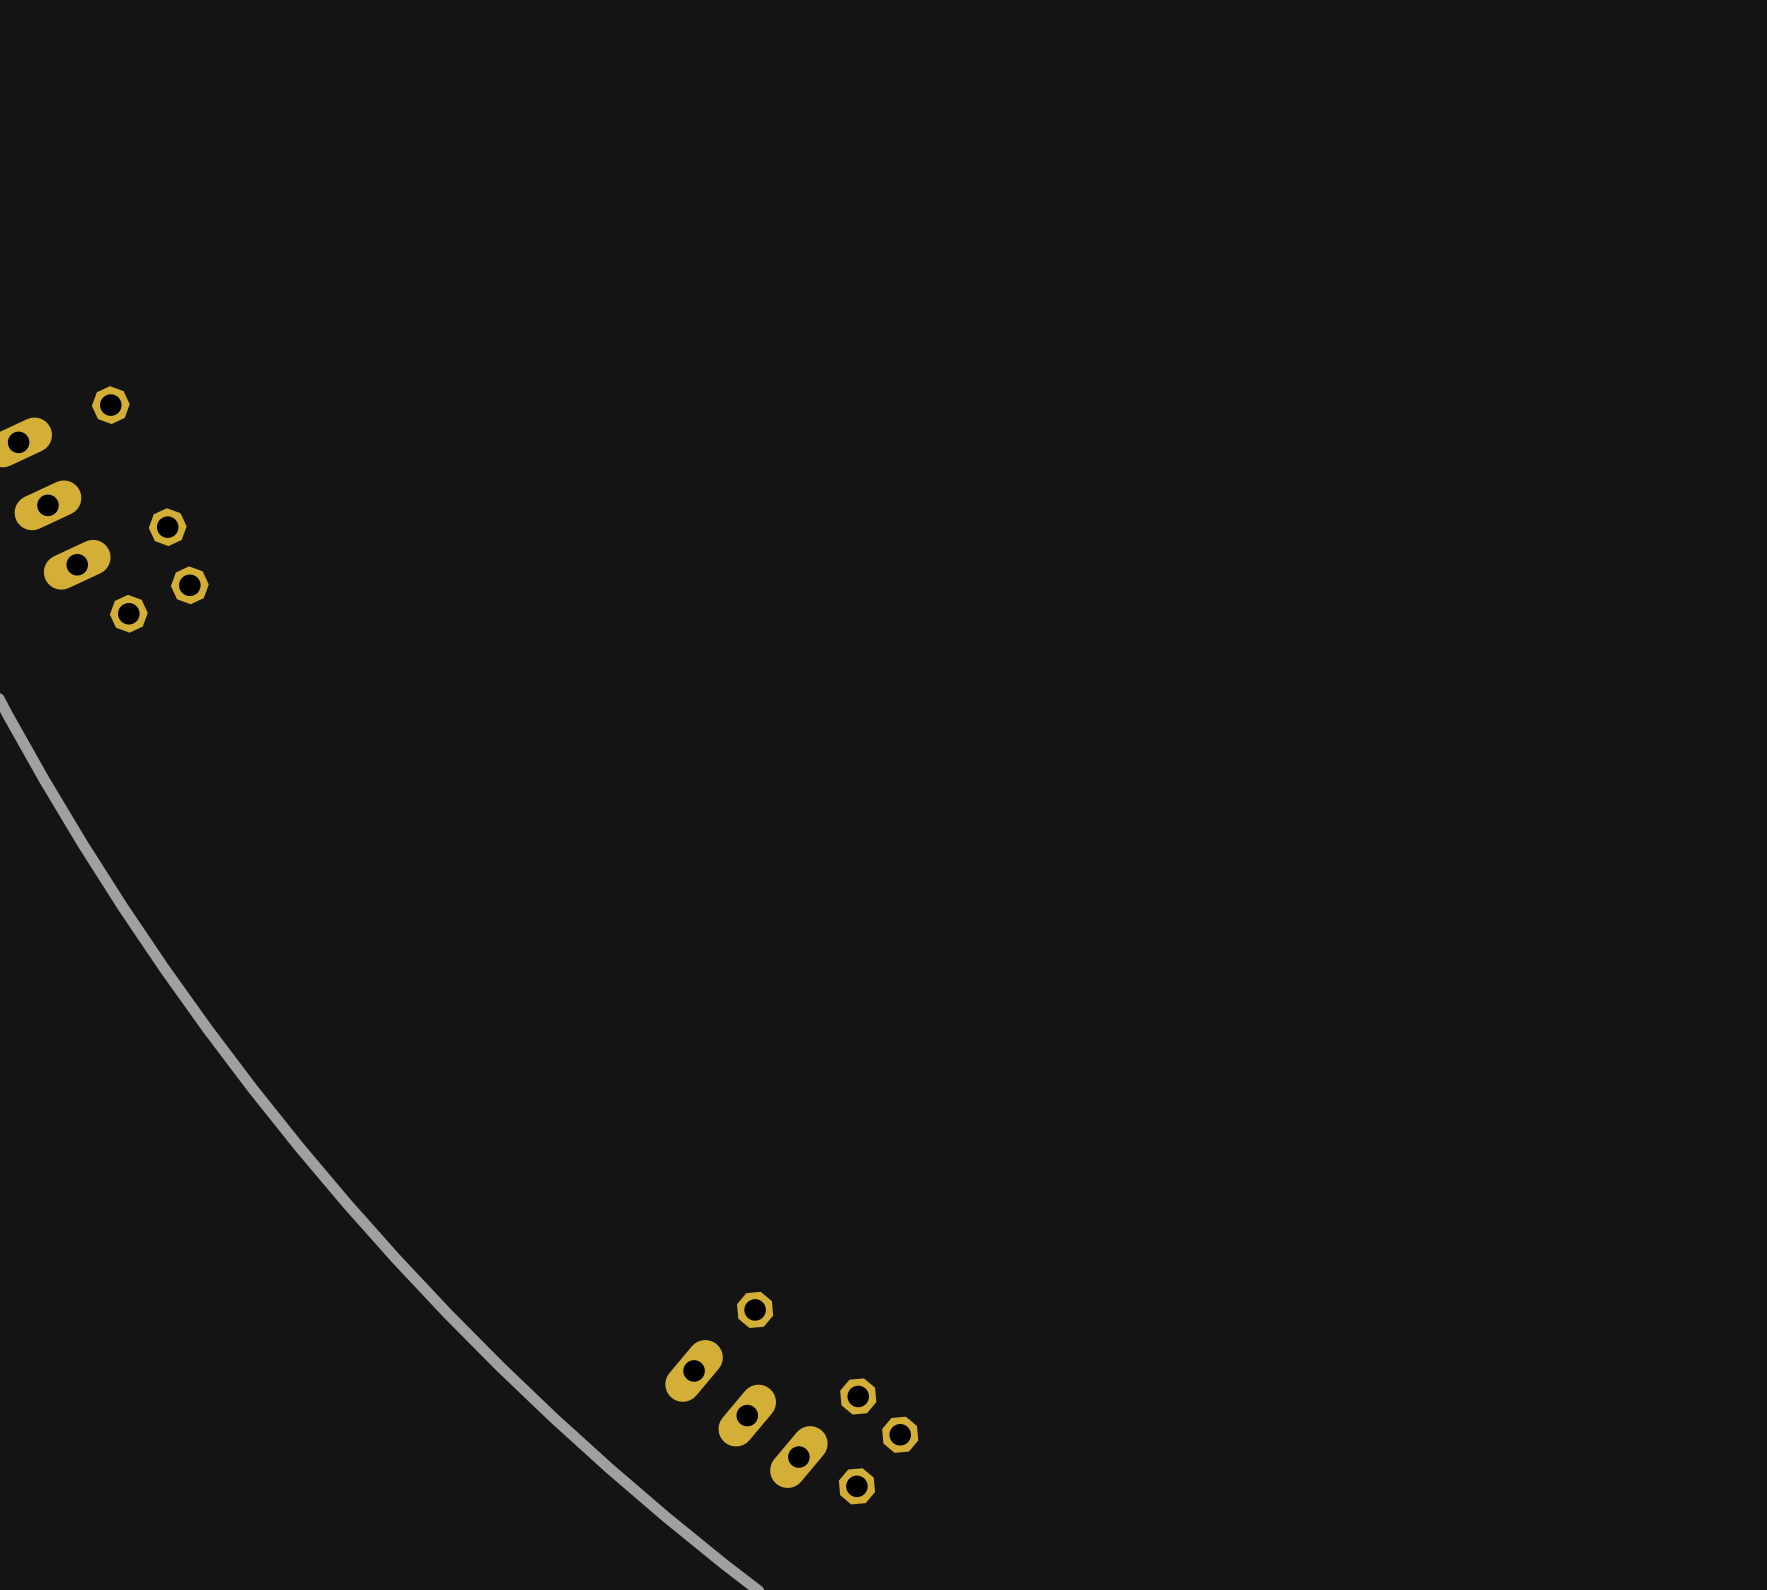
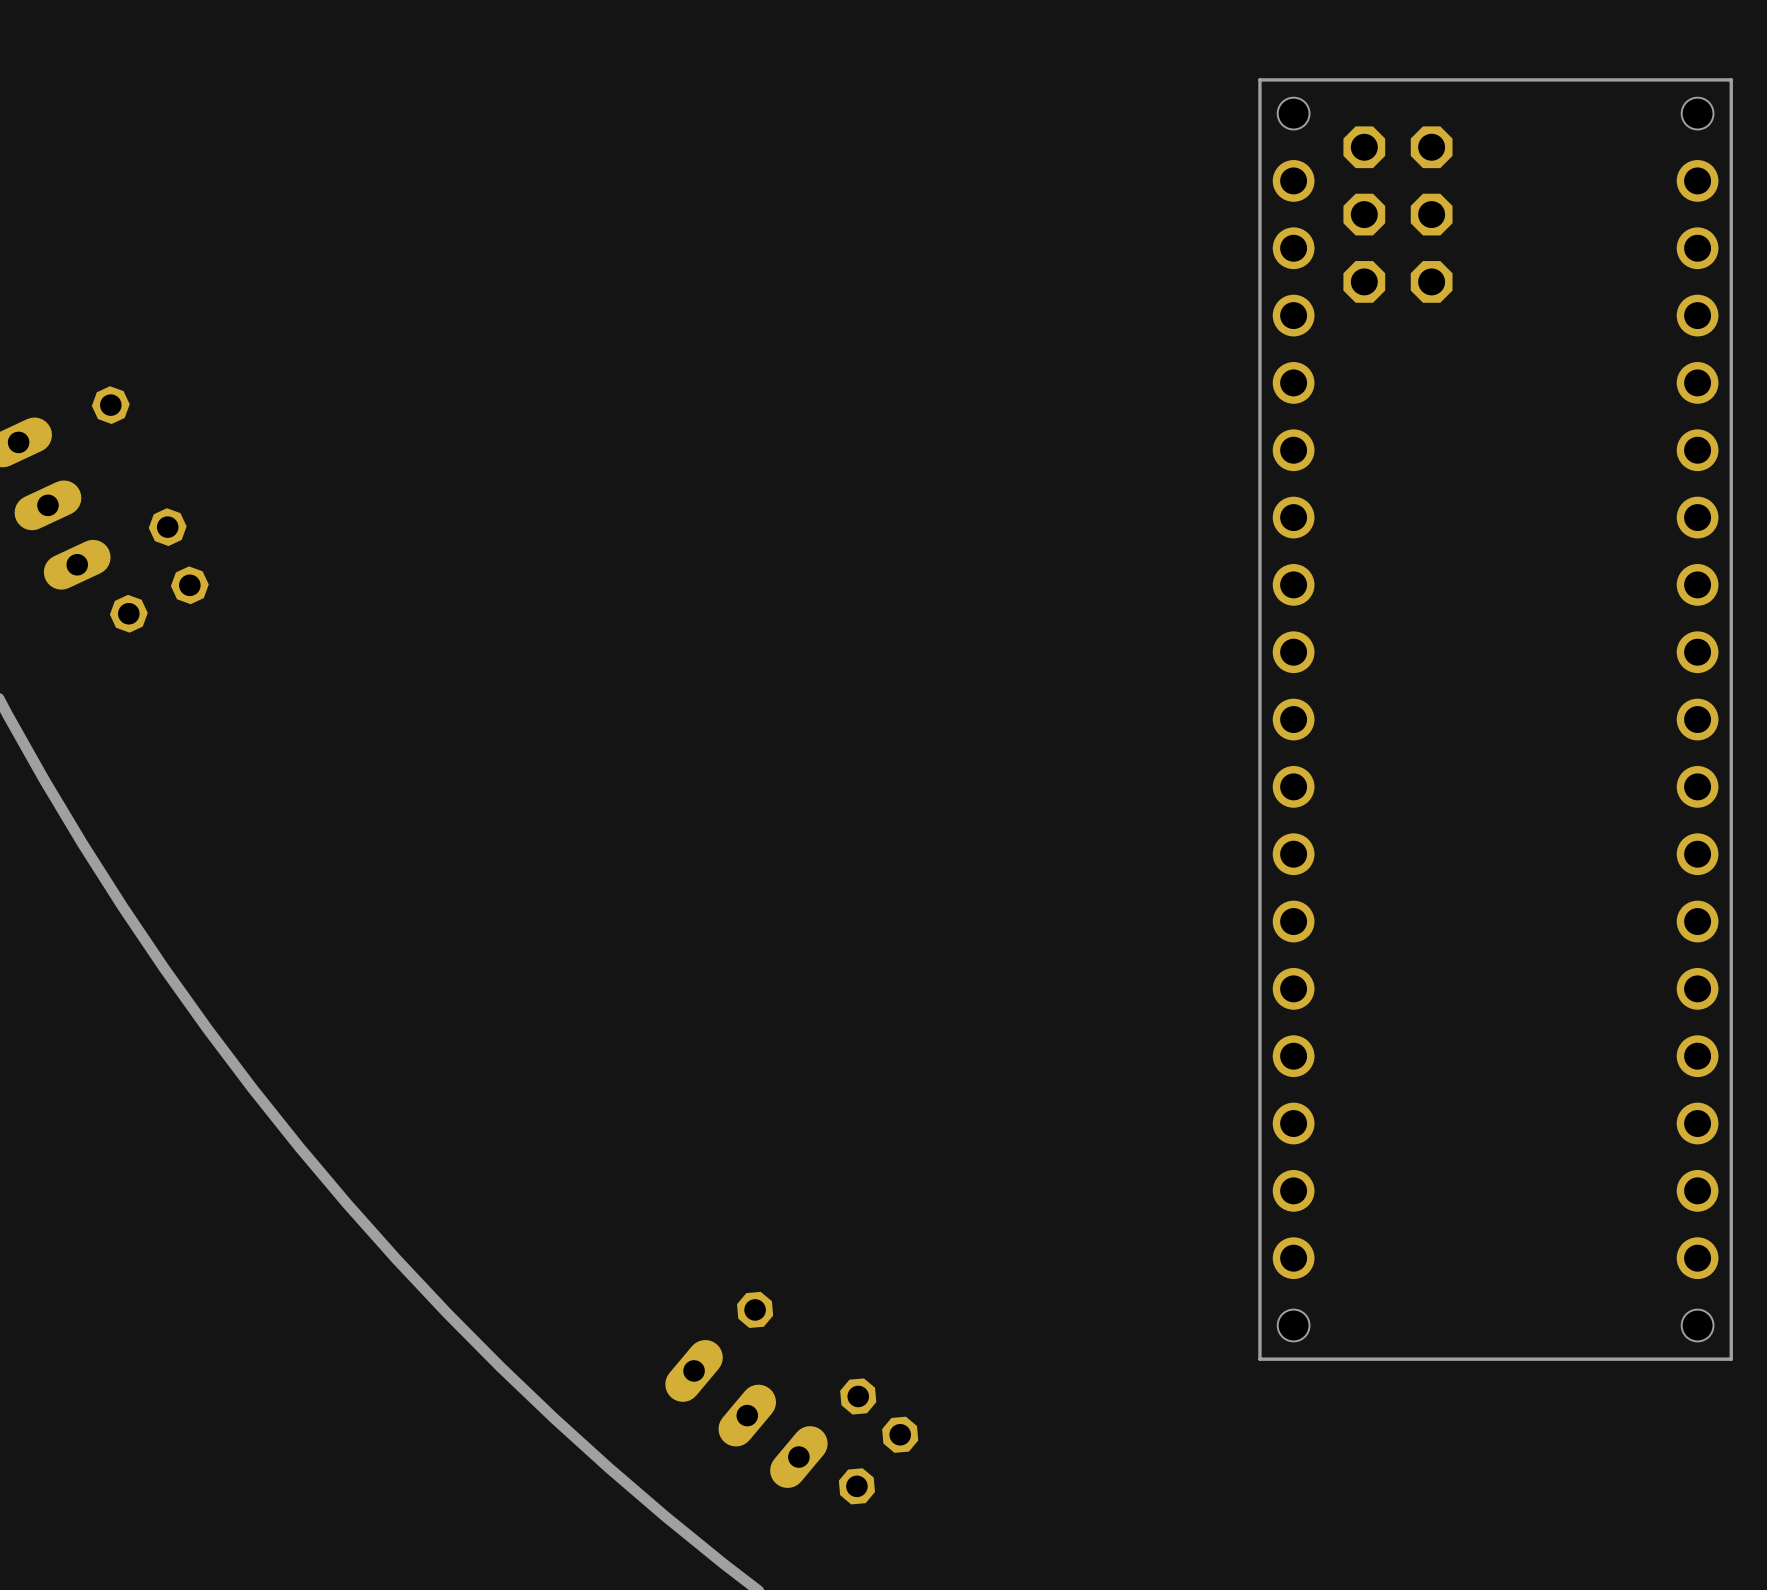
part: none -> (1495, 719)

